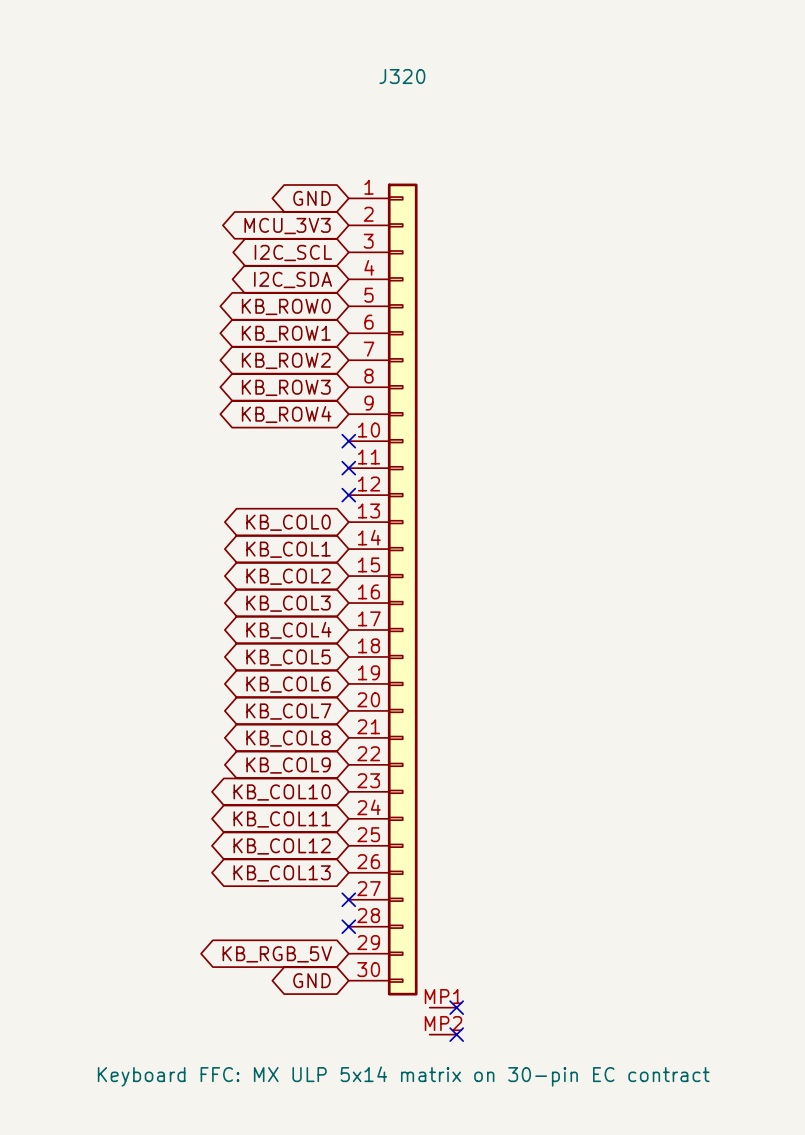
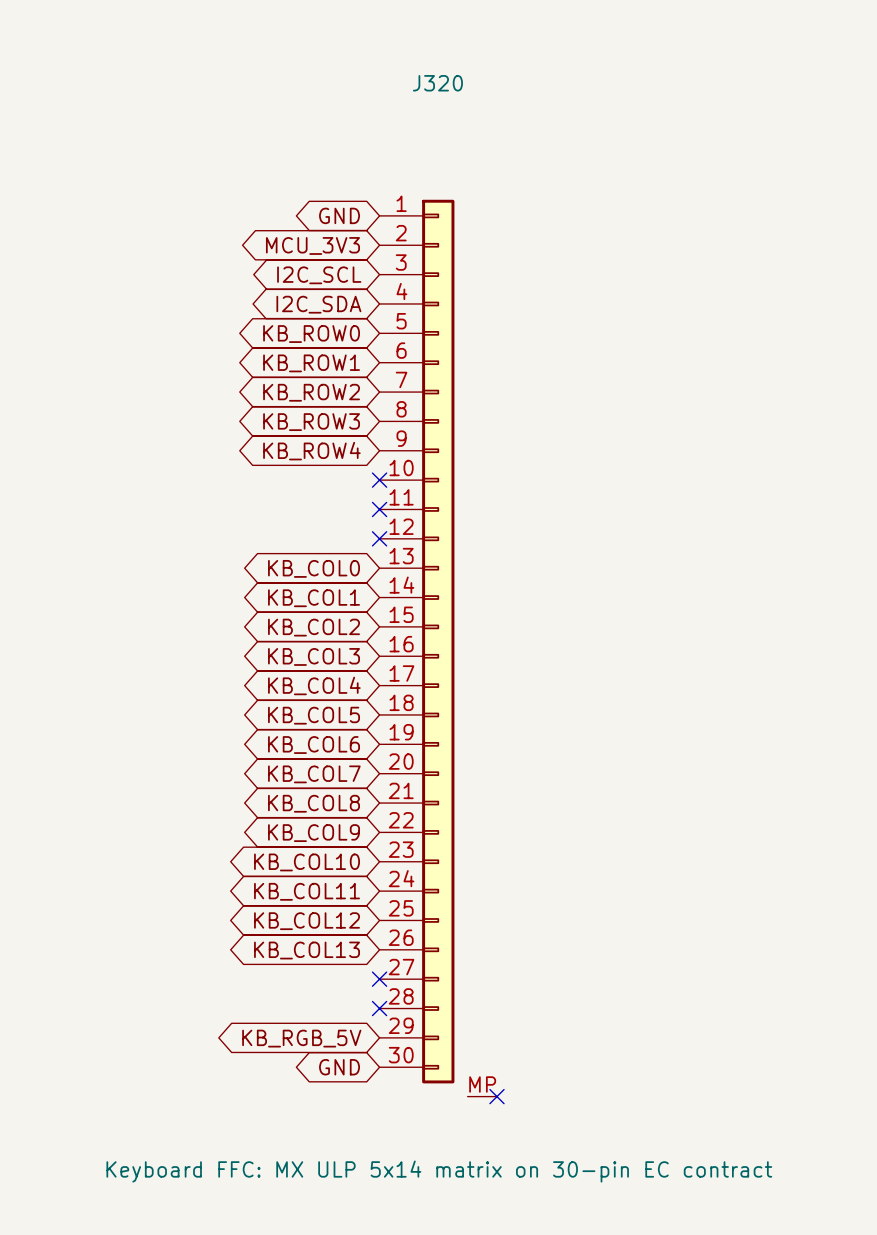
J320 symbol: [348, 183, 457, 1035] -> [379, 199, 497, 1097]
no-connect mark: (456, 1034) -> none

